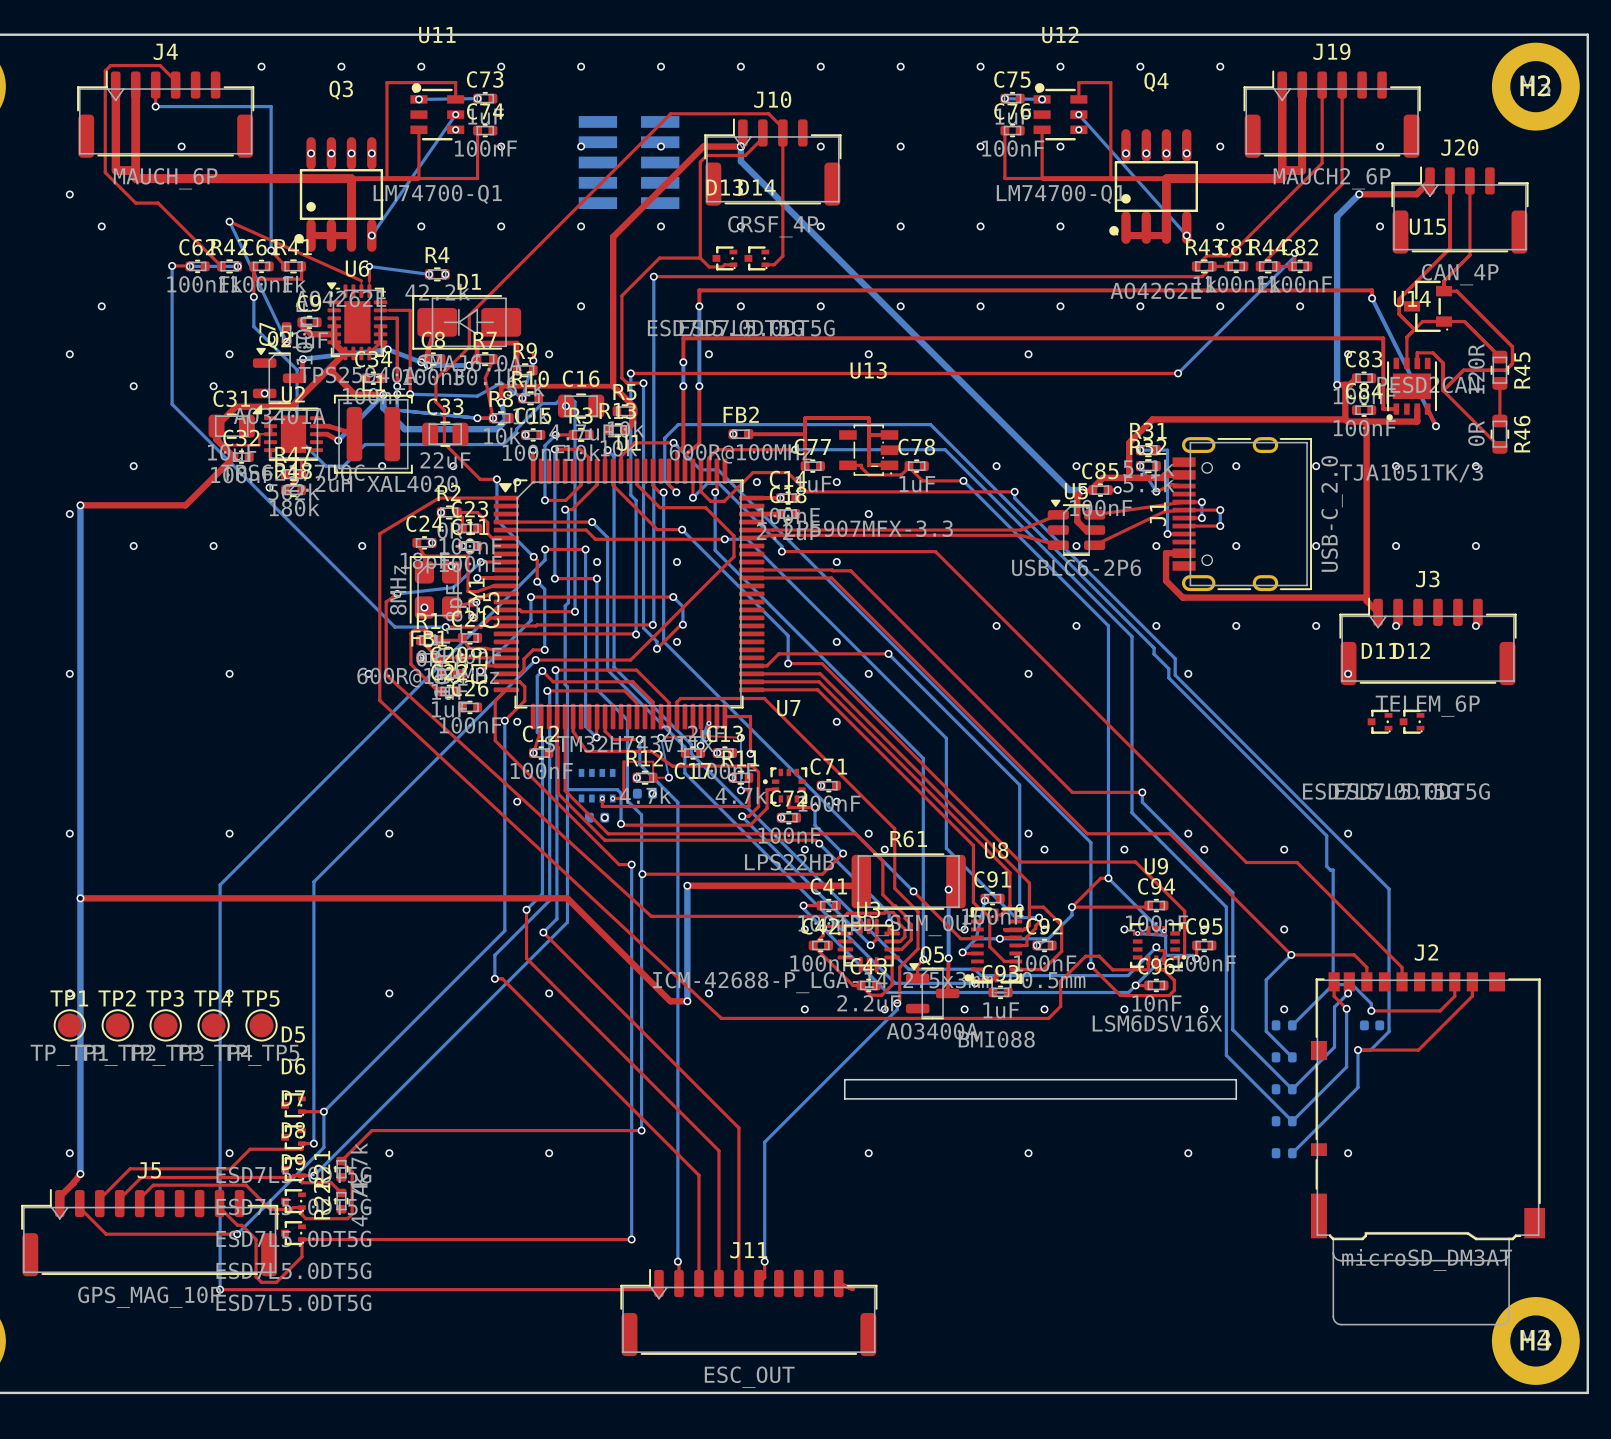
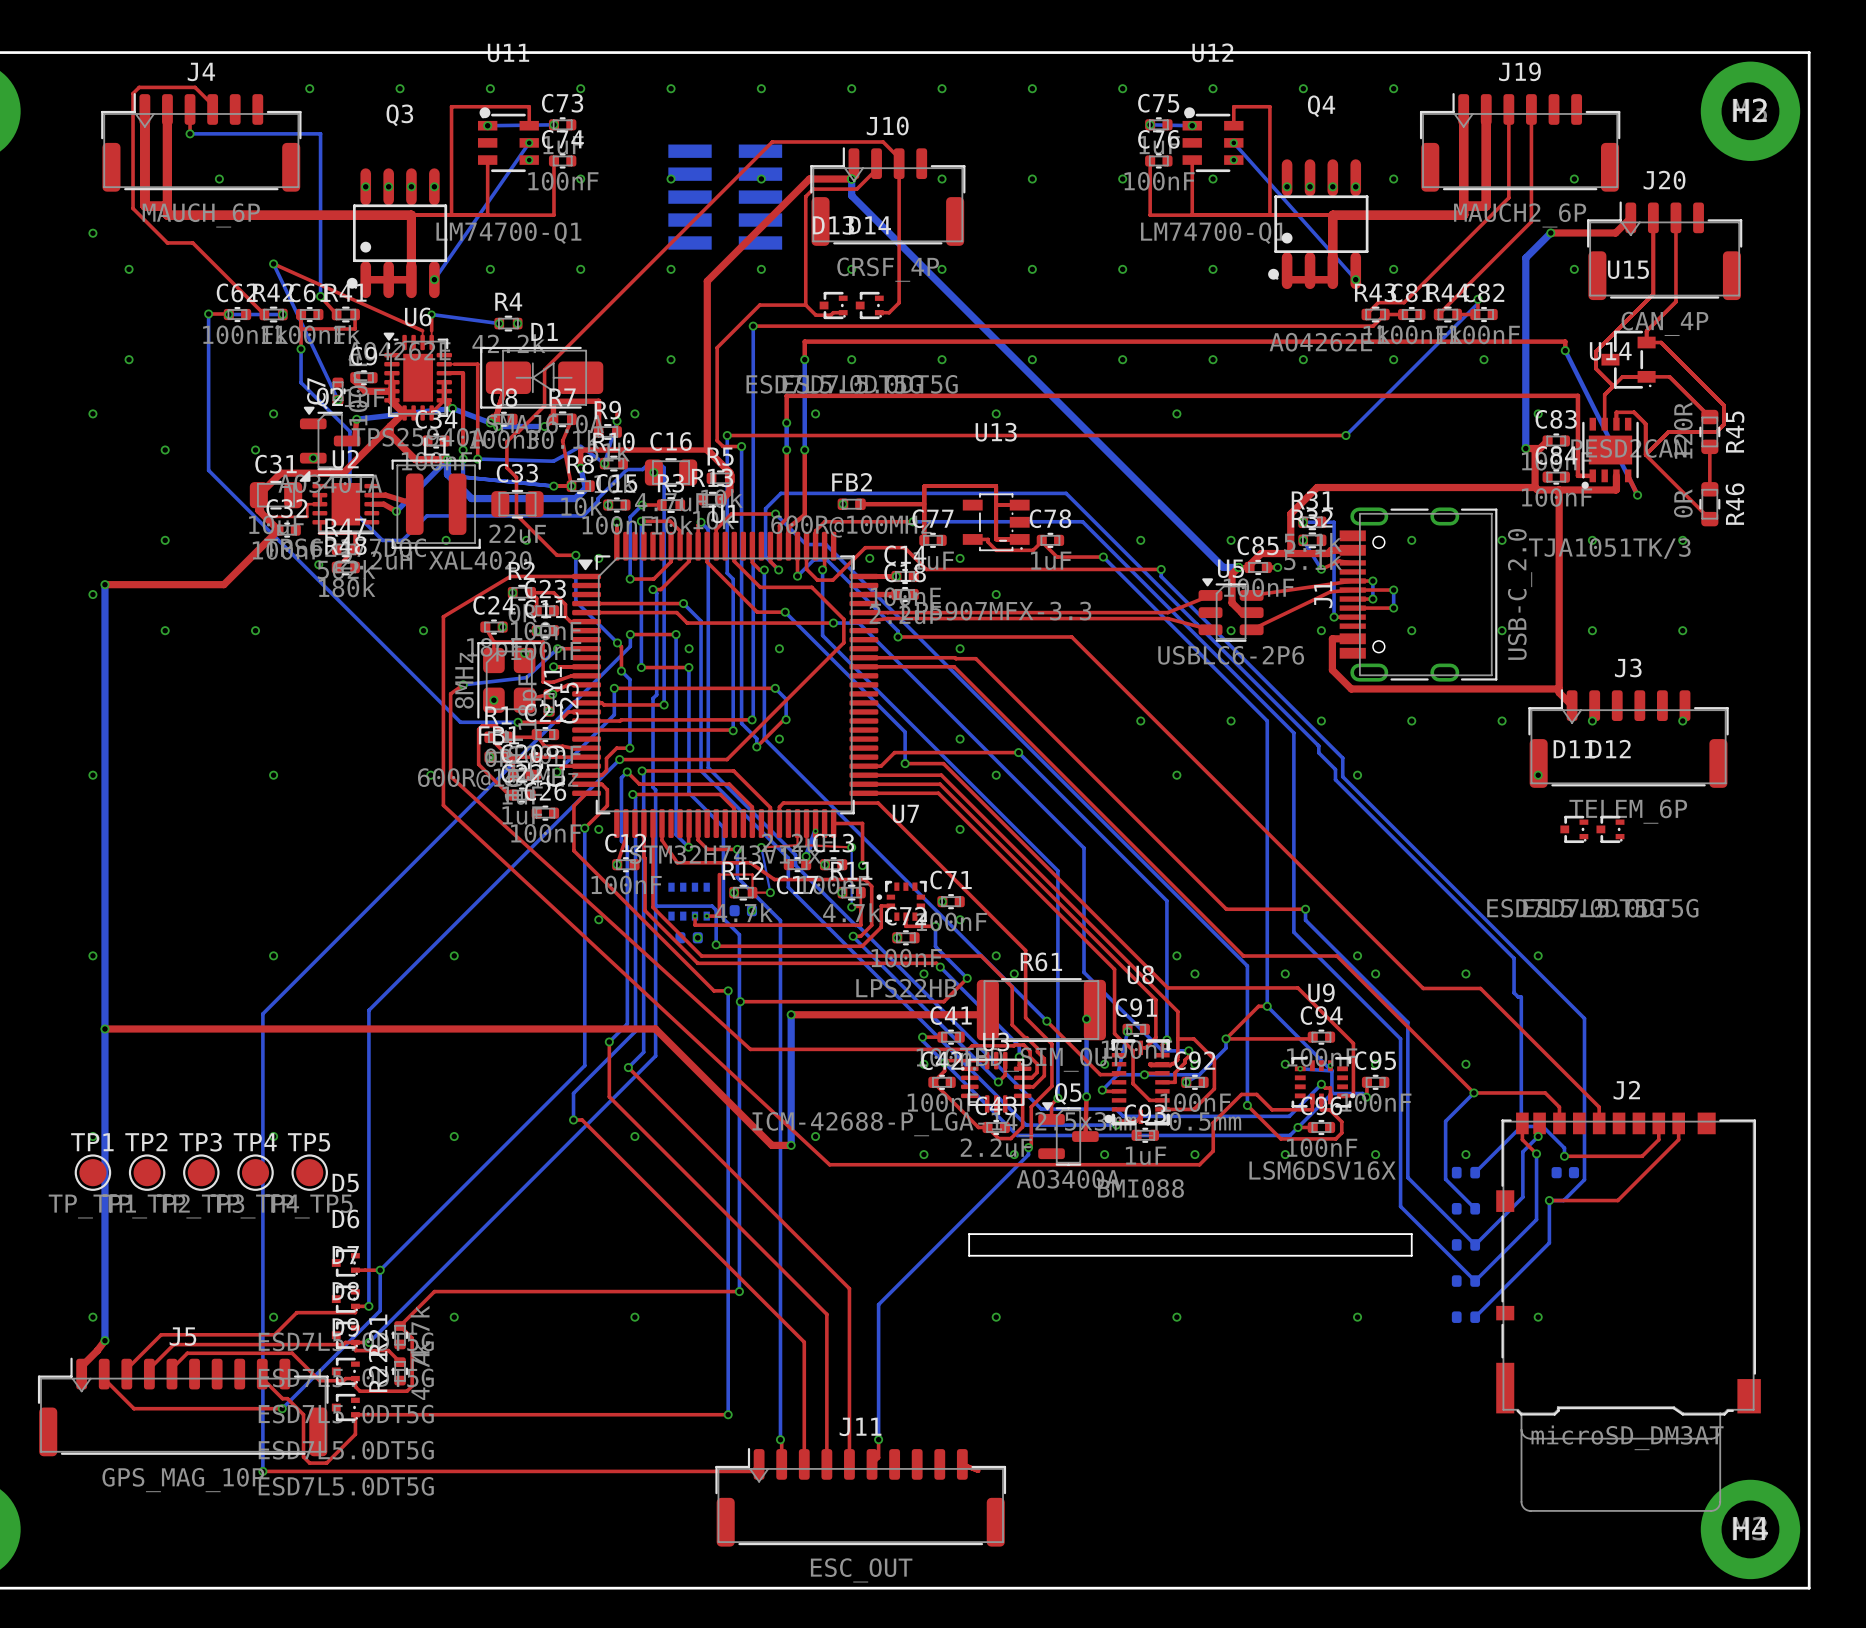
C96 value: 10nF (1157, 1003) -> 100nF (1322, 1147)

